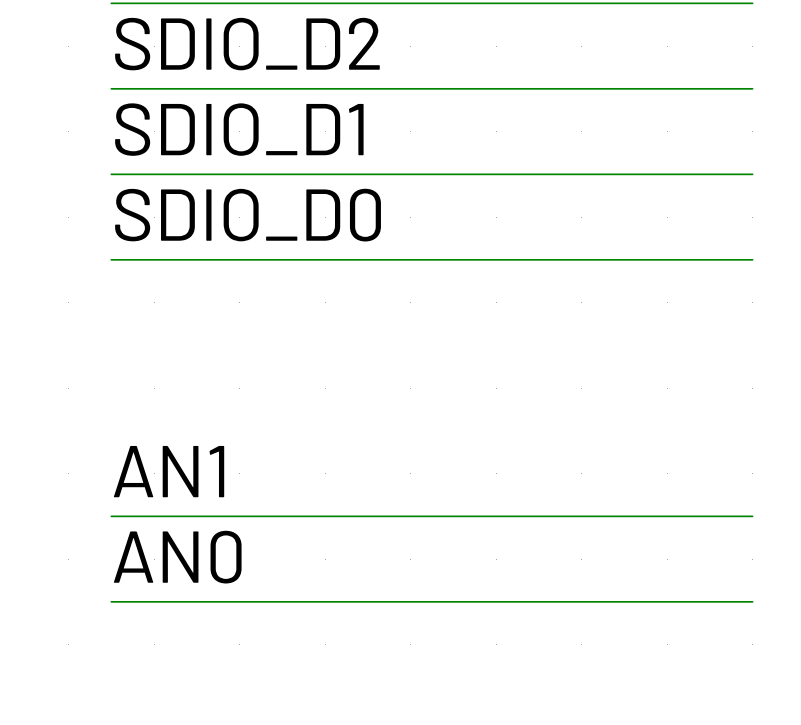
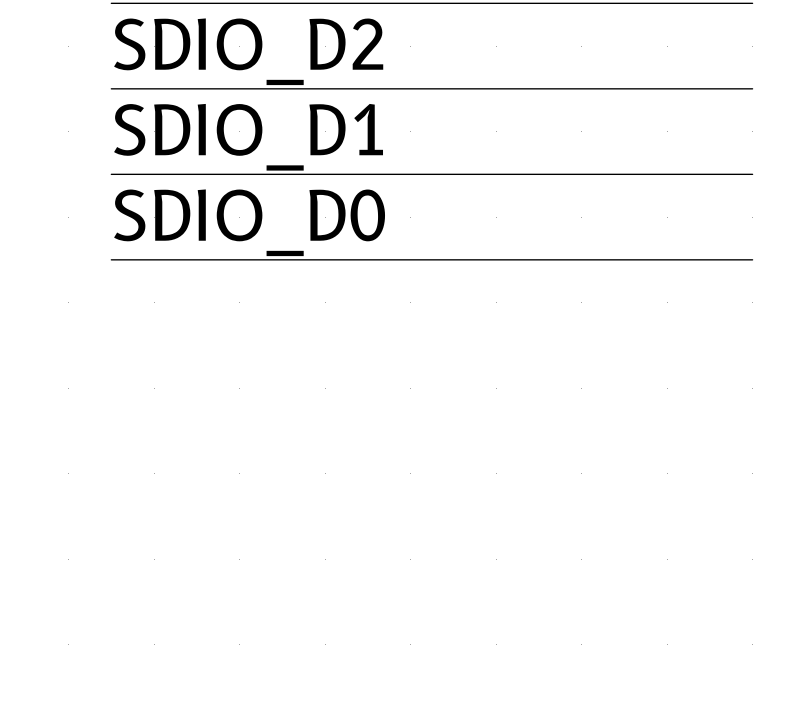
label: AN1 (168, 471) -> none
wire: (111, 516) (752, 516) -> none
label: AN0 (177, 557) -> none
wire: (111, 601) (752, 601) -> none

